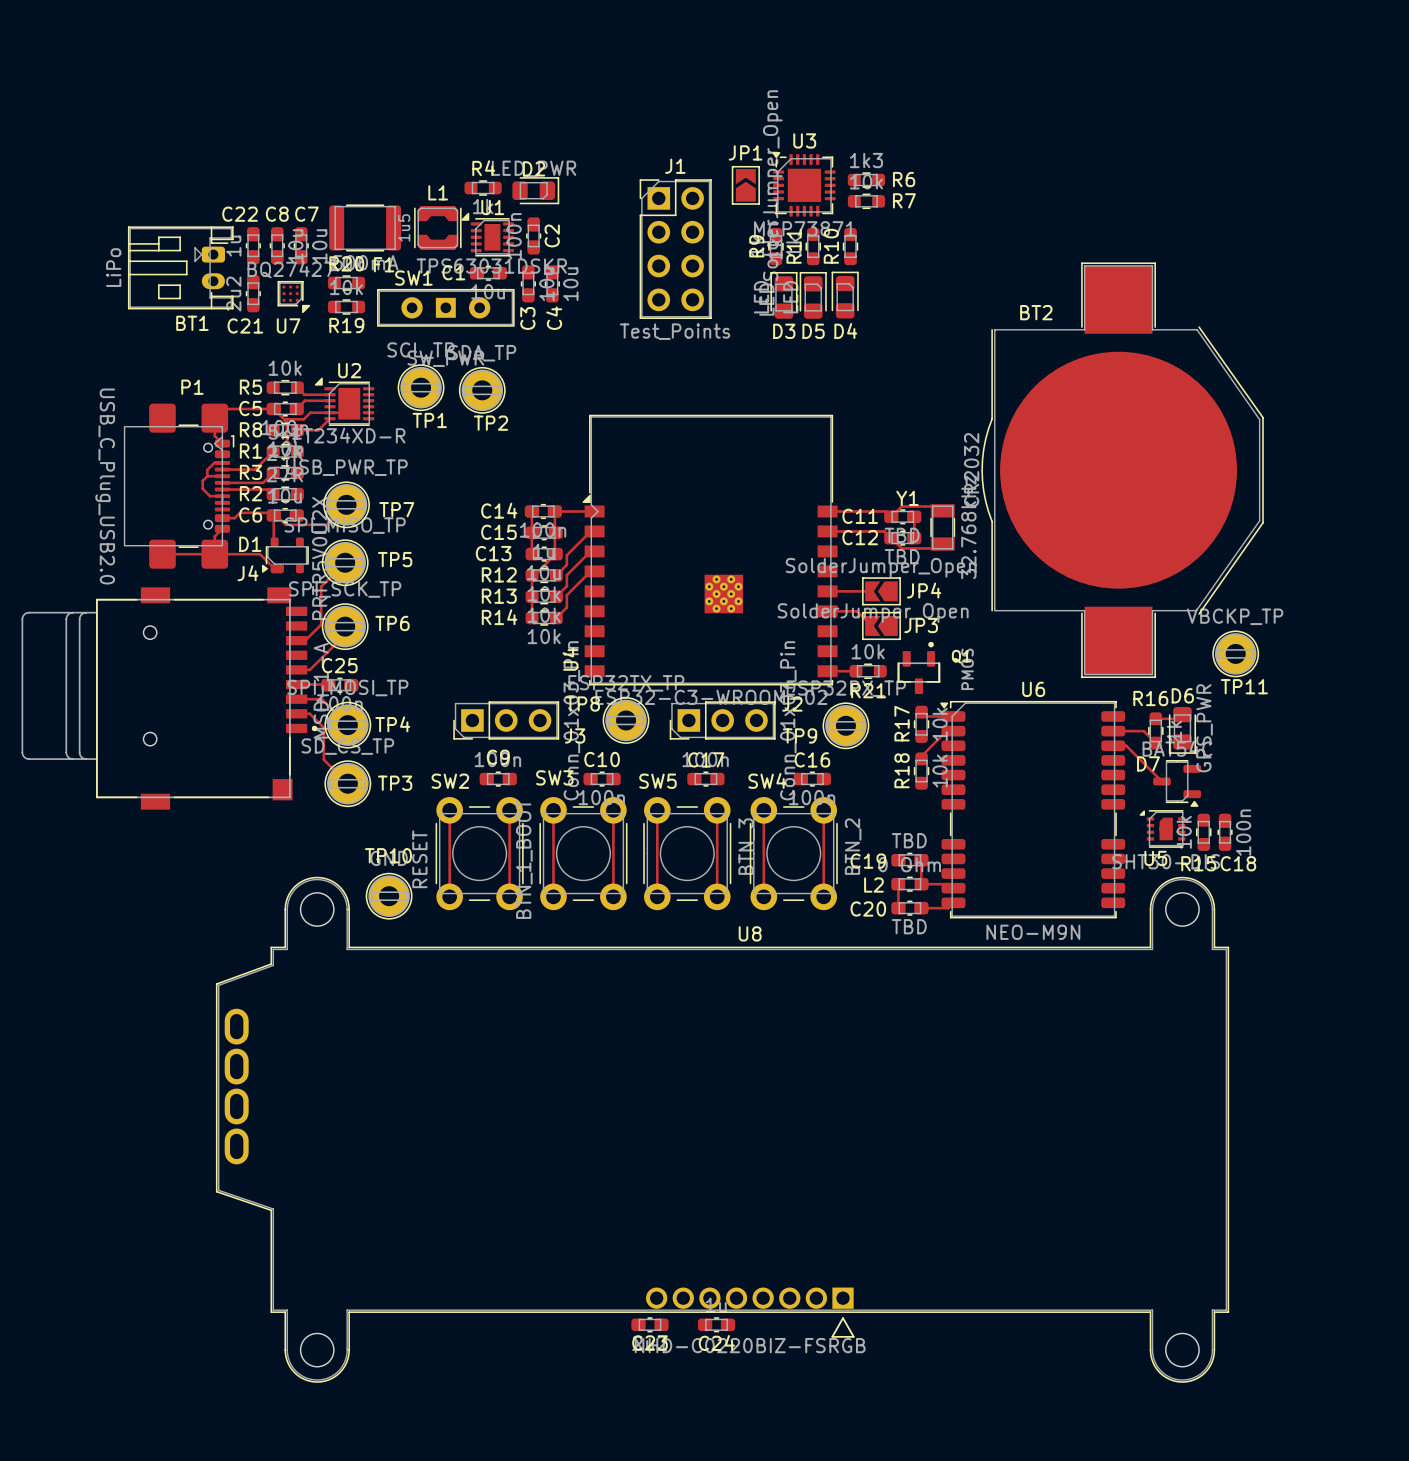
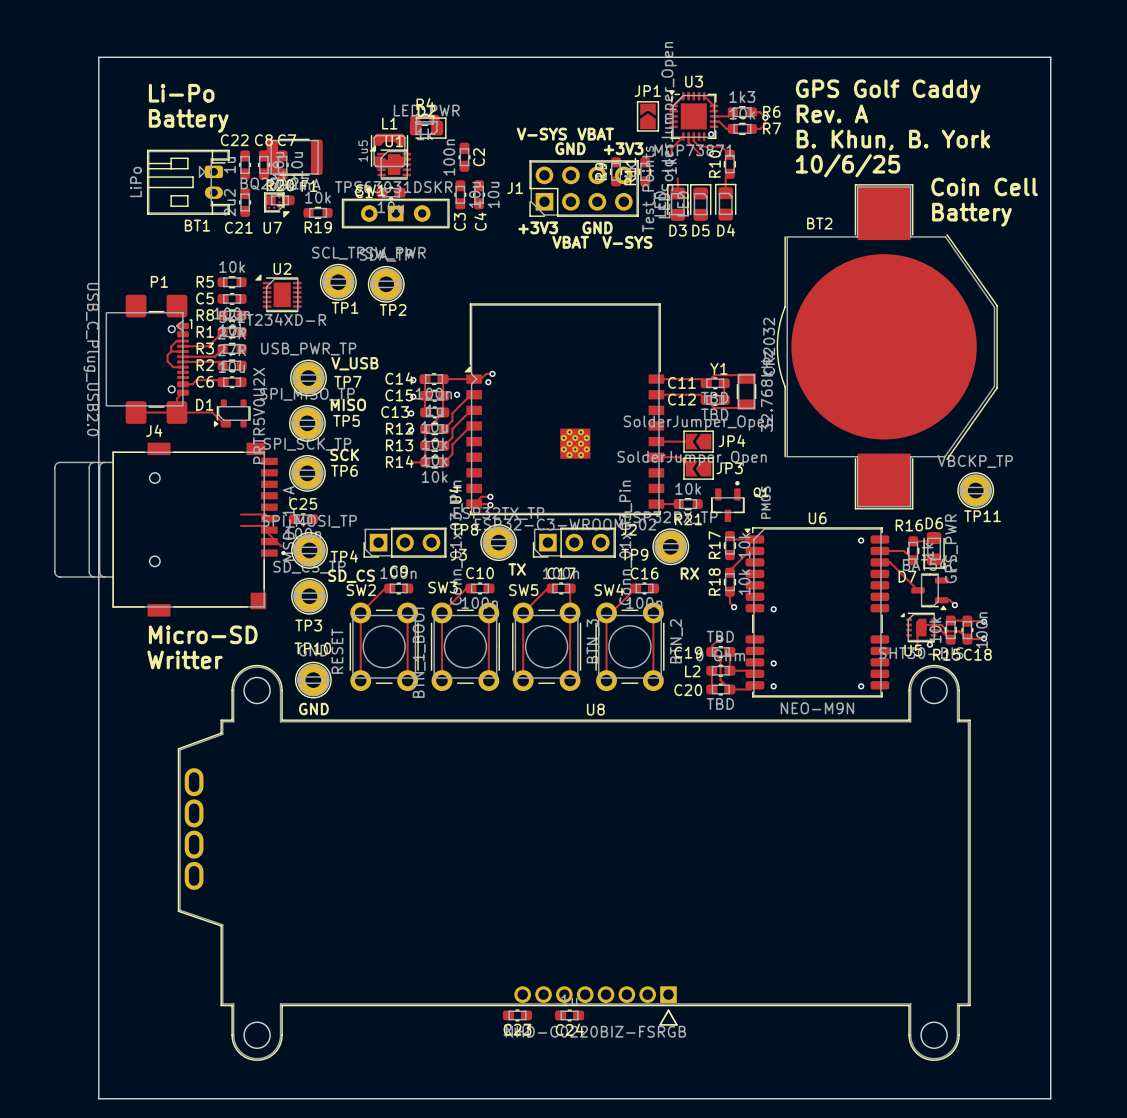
board edge: none -> (98, 57) (1050, 57) (1050, 1098) (98, 1098) (98, 57)
text: none -> GPS Golf Caddy (888, 91)
text: none -> Li-Po (181, 93)
top track: none -> (683, 96) (673, 105)
top track: none -> (704, 96) (713, 105) (713, 111)
top track: none -> (732, 112) (728, 116) (713, 116)
top track: none -> (751, 112) (759, 112) (765, 117) (765, 123) (760, 128) (751, 128)
text: none -> Rev. A (832, 113)
via: none -> (765, 117)
R6 position: (866, 180) -> (742, 112)
text: none -> Battery (188, 120)
top track: none -> (713, 121) (719, 121) (726, 128) (732, 128)
U3 position: (804, 184) -> (693, 115)
JP1 position: (745, 185) -> (647, 116)
R4 position: (483, 188) -> (424, 119)
text: none -> V-SYS (541, 134)
text: none -> VBAT (595, 134)
via: none -> (711, 134)
top track: none -> (683, 136) (671, 148) (671, 154)
R7 position: (866, 201) -> (742, 128)
top track: none -> (688, 136) (688, 142) (700, 154)
top track: none -> (693, 136) (693, 141) (699, 146) (721, 146) (729, 154)
text: none -> B. Khun, B. York (893, 140)
text: none -> GND (570, 148)
text: none -> +3V3 (623, 148)
L1 position: (437, 227) -> (389, 151)
C2 position: (533, 235) -> (464, 157)
text: none -> 10/6/25 (848, 165)
C22 position: (253, 245) -> (245, 164)
C8 position: (277, 245) -> (263, 164)
C7 position: (301, 245) -> (282, 164)
R10 position: (850, 246) -> (729, 164)
J1 rotation: 0° (675, 249) -> 90° counterclockwise (584, 188)
top track: none -> (729, 174) (725, 178) (725, 193)
top track: none -> (677, 178) (677, 193)
text: none -> Coin Cell (984, 186)
BT1 position: (180, 267) -> (188, 182)
C3 position: (528, 283) -> (460, 194)
C4 position: (552, 283) -> (479, 194)
C21 position: (253, 293) -> (245, 202)
D3 position: (783, 295) -> (677, 202)
D5 position: (813, 295) -> (700, 202)
D4 position: (845, 295) -> (725, 202)
U7 position: (293, 297) -> (276, 205)
text: none -> Battery (971, 214)
R19 position: (346, 307) -> (318, 212)
SW1 position: (445, 307) -> (395, 213)
text: none -> +3V3 (538, 227)
text: none -> GND (597, 227)
text: none -> VBAT (570, 242)
text: none -> V-SYS (627, 242)
top track: (297, 387) (304, 394) (330, 394) -> none
top track: (330, 400) (305, 400) (296, 408) -> none
top track: (349, 403) (340, 412) (310, 412) (303, 419) (284, 420) -> none
top track: (330, 418) (318, 430) (297, 430) -> none
top track: (222, 443) (214, 435) (214, 418) (223, 408) (273, 408) (286, 422) (286, 441) (297, 451) -> none
text: none -> V_USB (354, 363)
top track: (346, 504) (326, 524) (285, 524) (273, 512) (274, 542) -> none
TP7 position: (346, 504) -> (308, 378)
top track: none -> (492, 373) (486, 373) (481, 379)
via: none -> (492, 373)
via: none -> (413, 380)
via: none -> (488, 382)
via: none -> (457, 394)
via: none -> (413, 396)
text: none -> MISO (348, 404)
via: none -> (411, 413)
top track: (345, 562) (321, 586) (321, 624) (305, 640) (296, 640) -> none
TP5 position: (345, 562) -> (307, 423)
J4 name position: J4 (248, 573) -> J4 (154, 430)
via: none -> (411, 430)
text: none -> SCK (344, 454)
top track: none -> (425, 462) (411, 463)
top track: (345, 626) (345, 634) (309, 669) (296, 669) -> none
TP6 position: (345, 626) -> (307, 473)
top track: none -> (490, 496) (481, 496) (474, 504) (490, 505)
via: none -> (490, 496)
via: none -> (490, 505)
C25 position: (339, 685) -> (303, 519)
J4 position: (169, 698) -> (169, 529)
top track: (296, 713) (309, 713) (323, 727) (323, 759) (347, 783) -> none
via: none -> (861, 540)
TP4 name position: TP4 (392, 724) -> TP4 (344, 556)
TP4 position: (347, 725) -> (309, 550)
text: none -> TX (517, 569)
text: none -> RX (689, 573)
text: none -> SD_CS (351, 576)
top track: none -> (389, 588) (385, 588) (360, 612)
top track: none -> (471, 588) (466, 588) (441, 612)
top track: none -> (552, 588) (547, 588) (523, 612)
top track: none -> (570, 588) (570, 611)
top track: none -> (635, 588) (611, 612) (606, 612)
TP3 position: (347, 783) -> (309, 596)
TP3 name position: TP3 (395, 783) -> TP3 (308, 625)
top track: none -> (729, 591) (729, 603) (734, 607)
top track: none -> (941, 600) (950, 600) (954, 605)
via: none -> (954, 605)
via: none -> (734, 607)
via: none -> (773, 609)
top track: none -> (950, 620) (984, 621)
via: none -> (984, 621)
top track: none -> (933, 630) (940, 630) (950, 639)
text: none -> Micro-SD (203, 634)
top track: none -> (719, 638) (711, 646) (711, 651) (720, 660) (720, 680) (729, 689)
via: none -> (719, 638)
top track: none -> (984, 638) (967, 639) (959, 631) (947, 631) (941, 624) (923, 624) (917, 631) (917, 646)
via: none -> (984, 638)
via: none -> (929, 644)
text: none -> Writter (185, 659)
via: none -> (773, 663)
via: none -> (773, 686)
via: none -> (861, 686)
text: none -> GND (313, 709)

